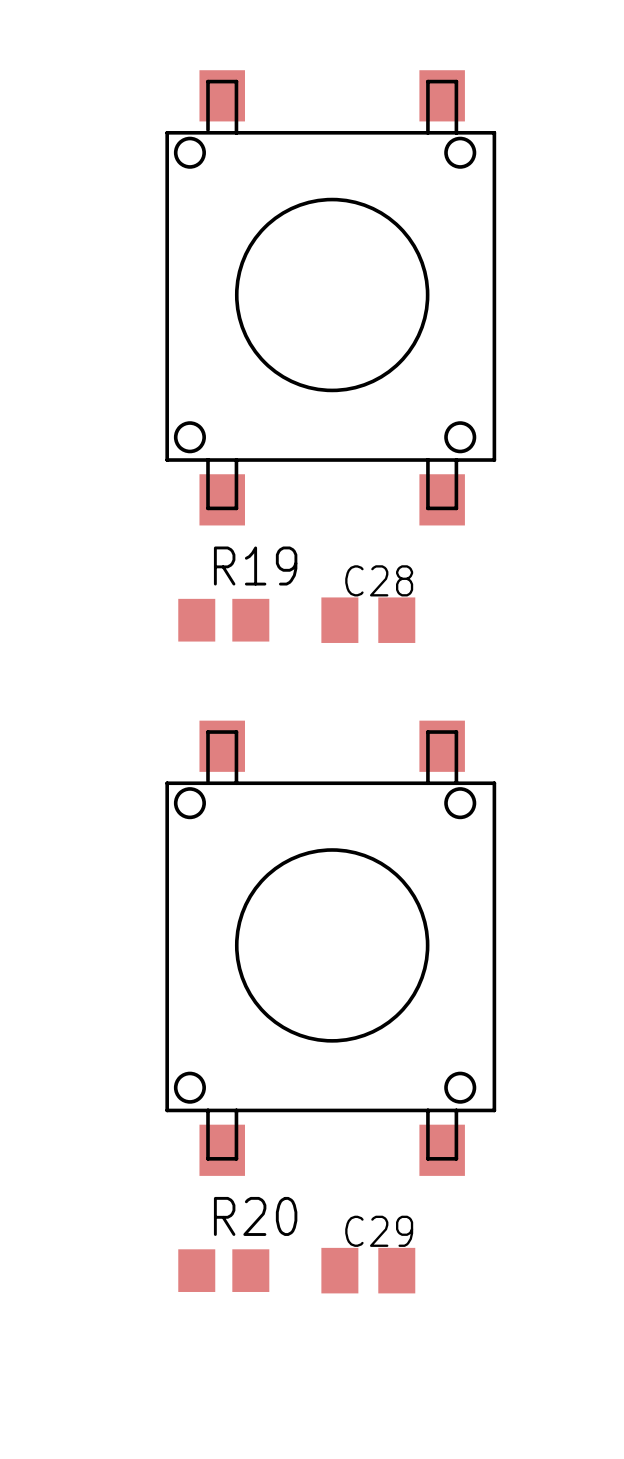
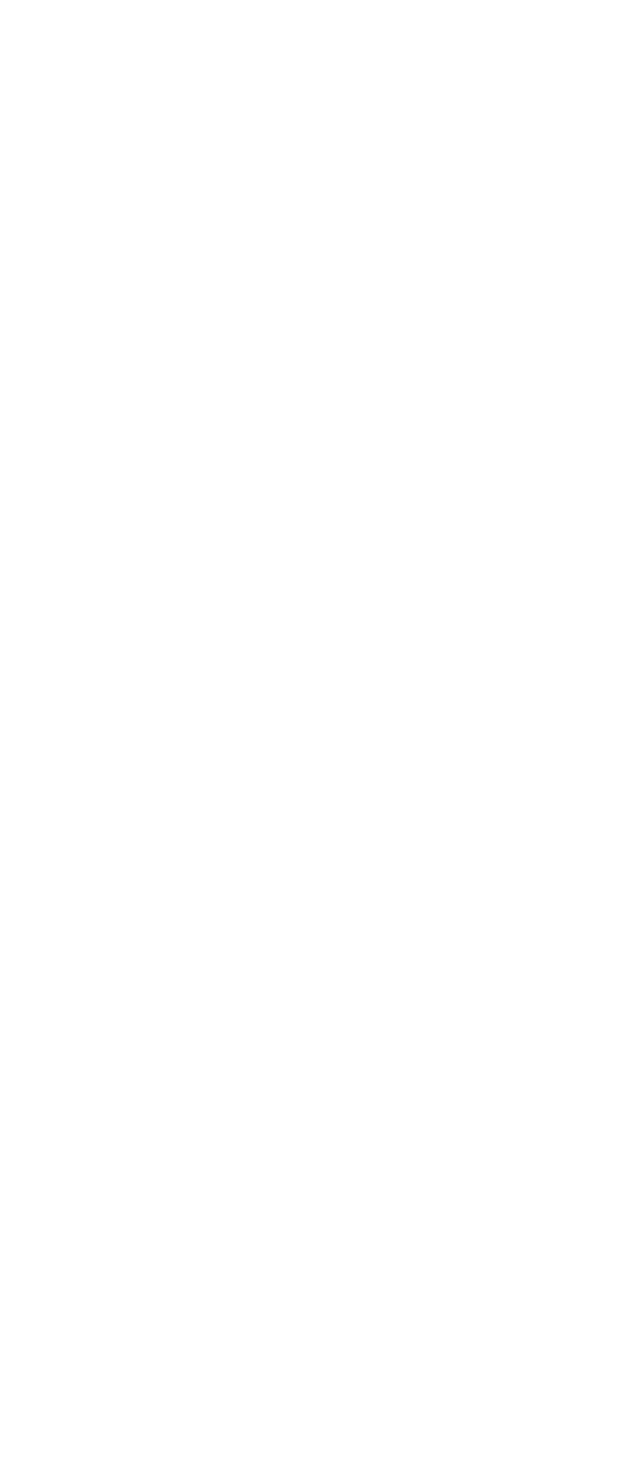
part: (330, 297) -> none
R19: (223, 620) -> none
C28: (368, 620) -> none
part: (330, 948) -> none
R20: (223, 1270) -> none
C29: (368, 1270) -> none

